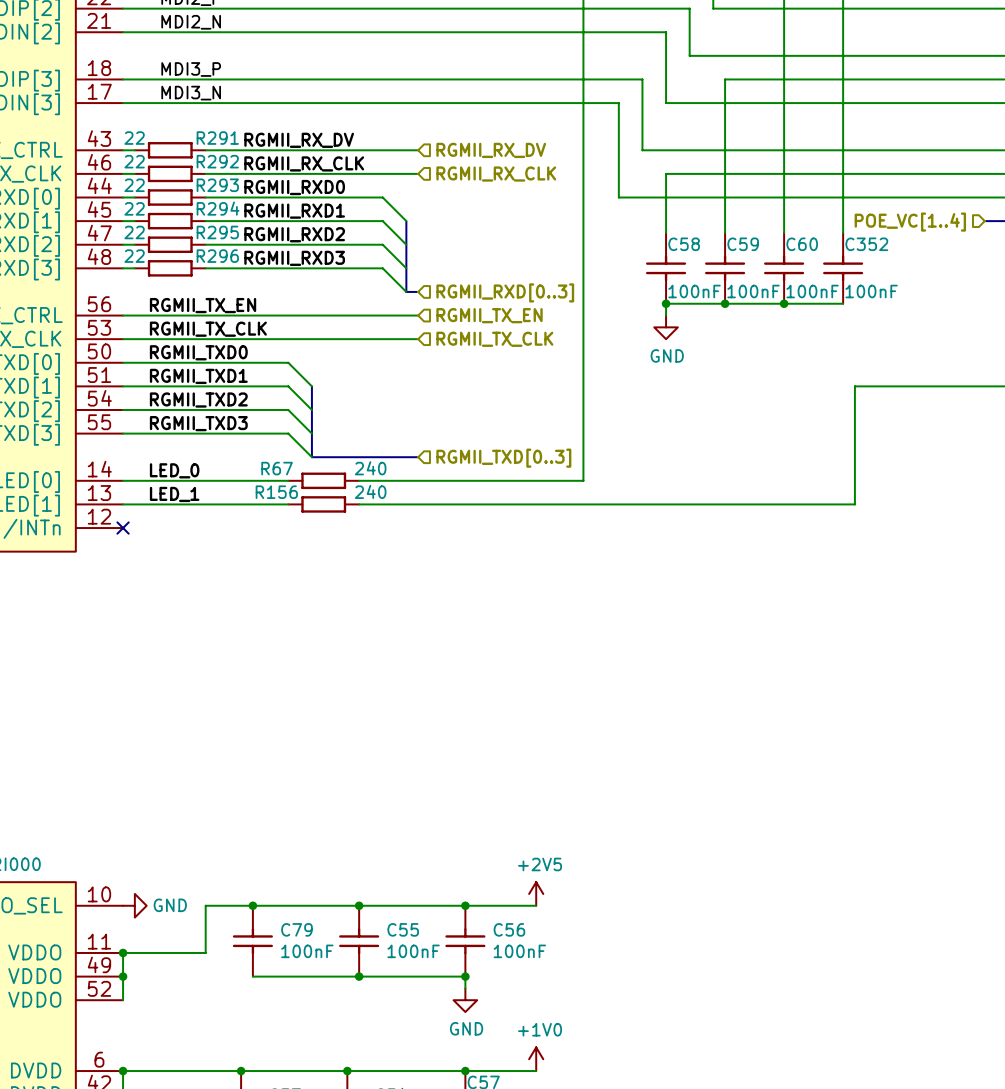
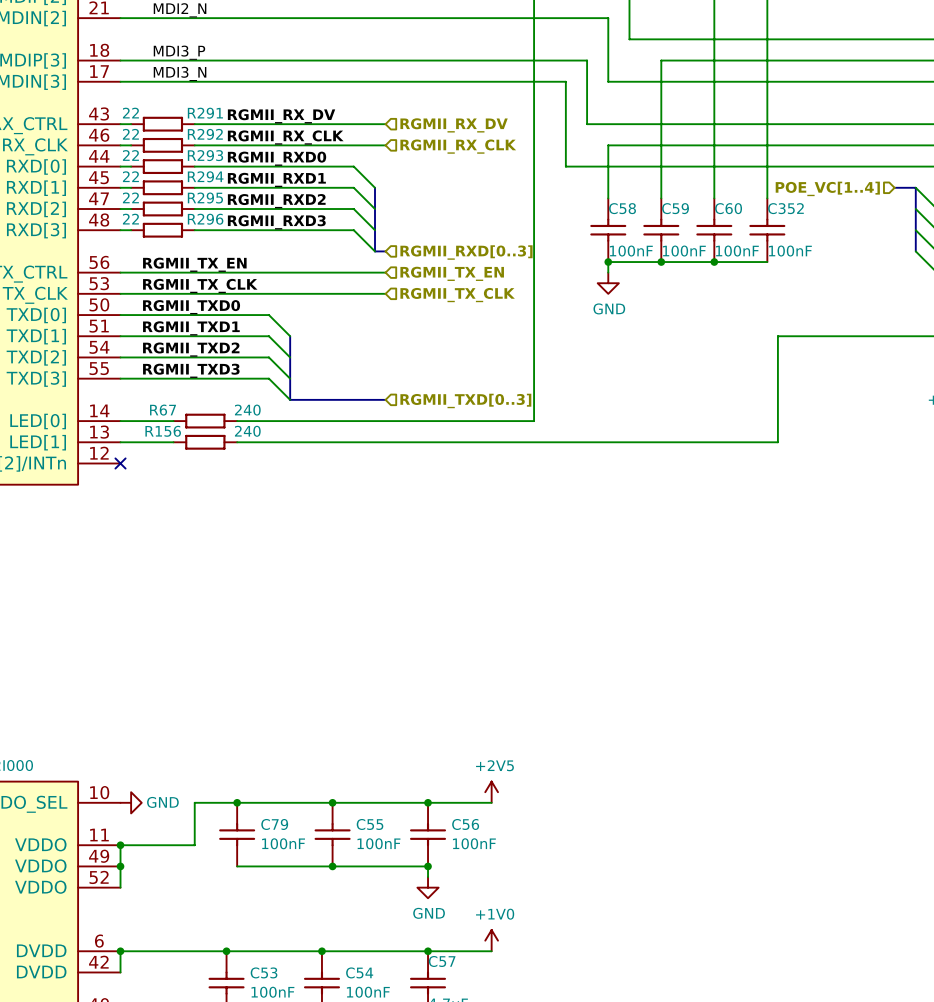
label: LED_0 (174, 470) -> none
wire: (182, 480) (252, 480) -> (268, 421) (332, 421)
R67 position: (323, 480) -> (205, 421)
label: LED_1 (174, 494) -> none
wire: (182, 504) (252, 504) -> (268, 442) (332, 442)
R156 position: (323, 504) -> (205, 442)

